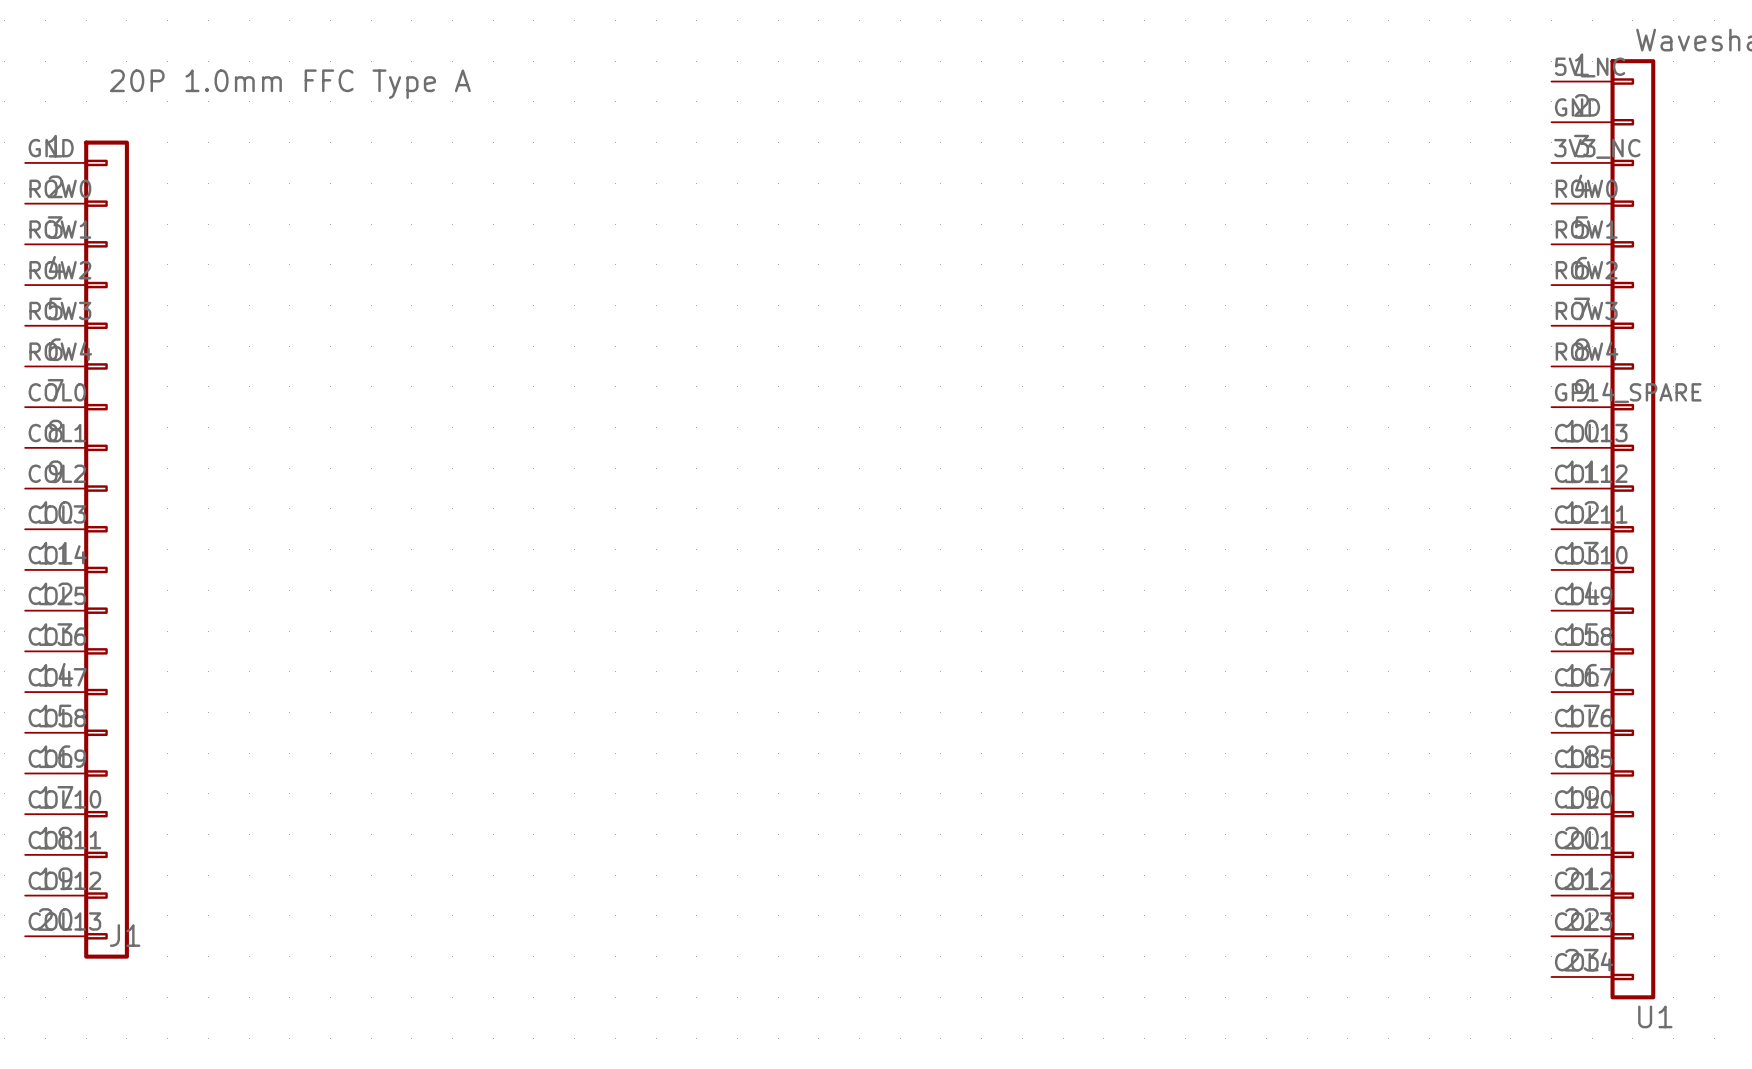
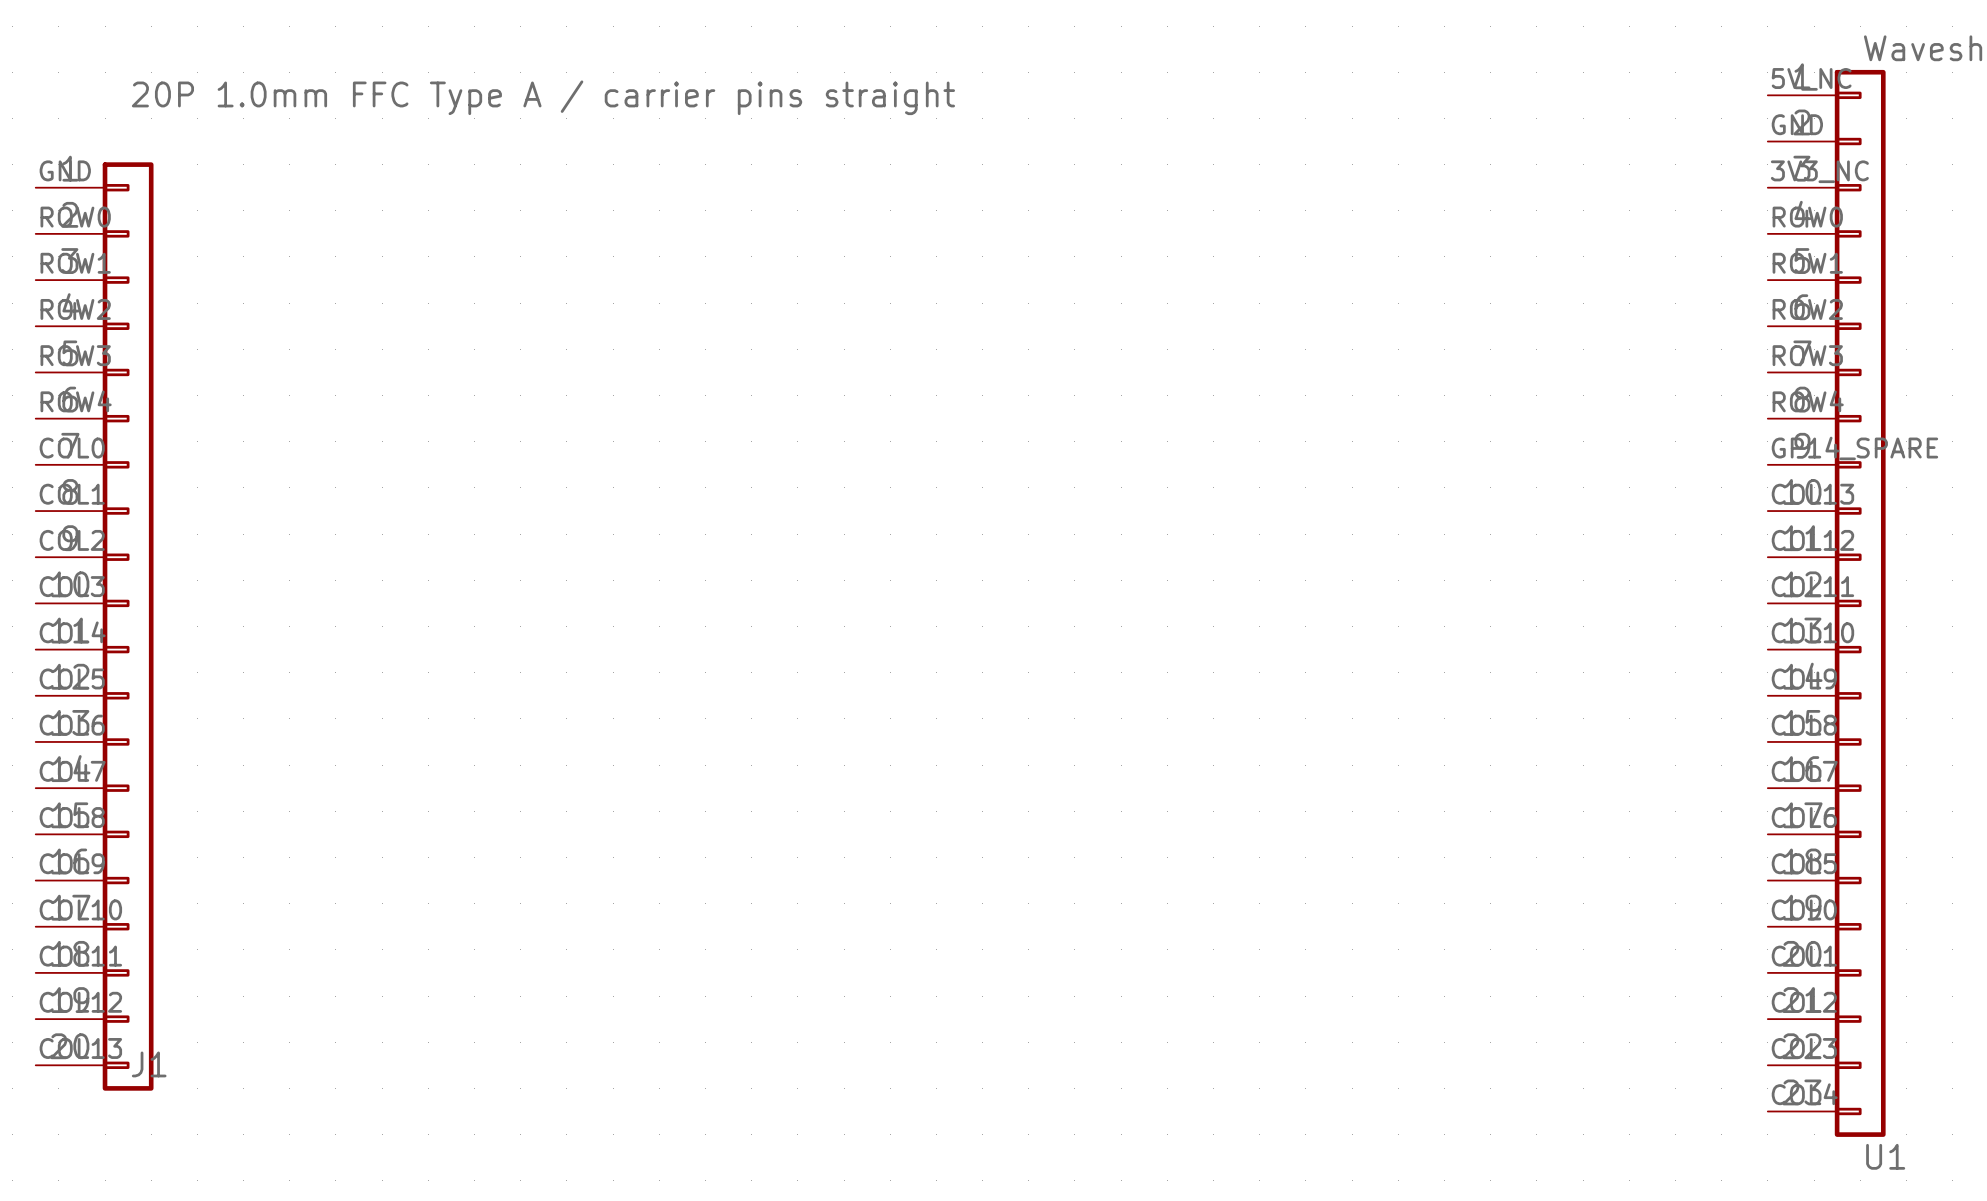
J1 value: 20P 1.0mm FFC Type A (290, 84) -> 20P 1.0mm FFC Type A / carrier pins straight (543, 97)

